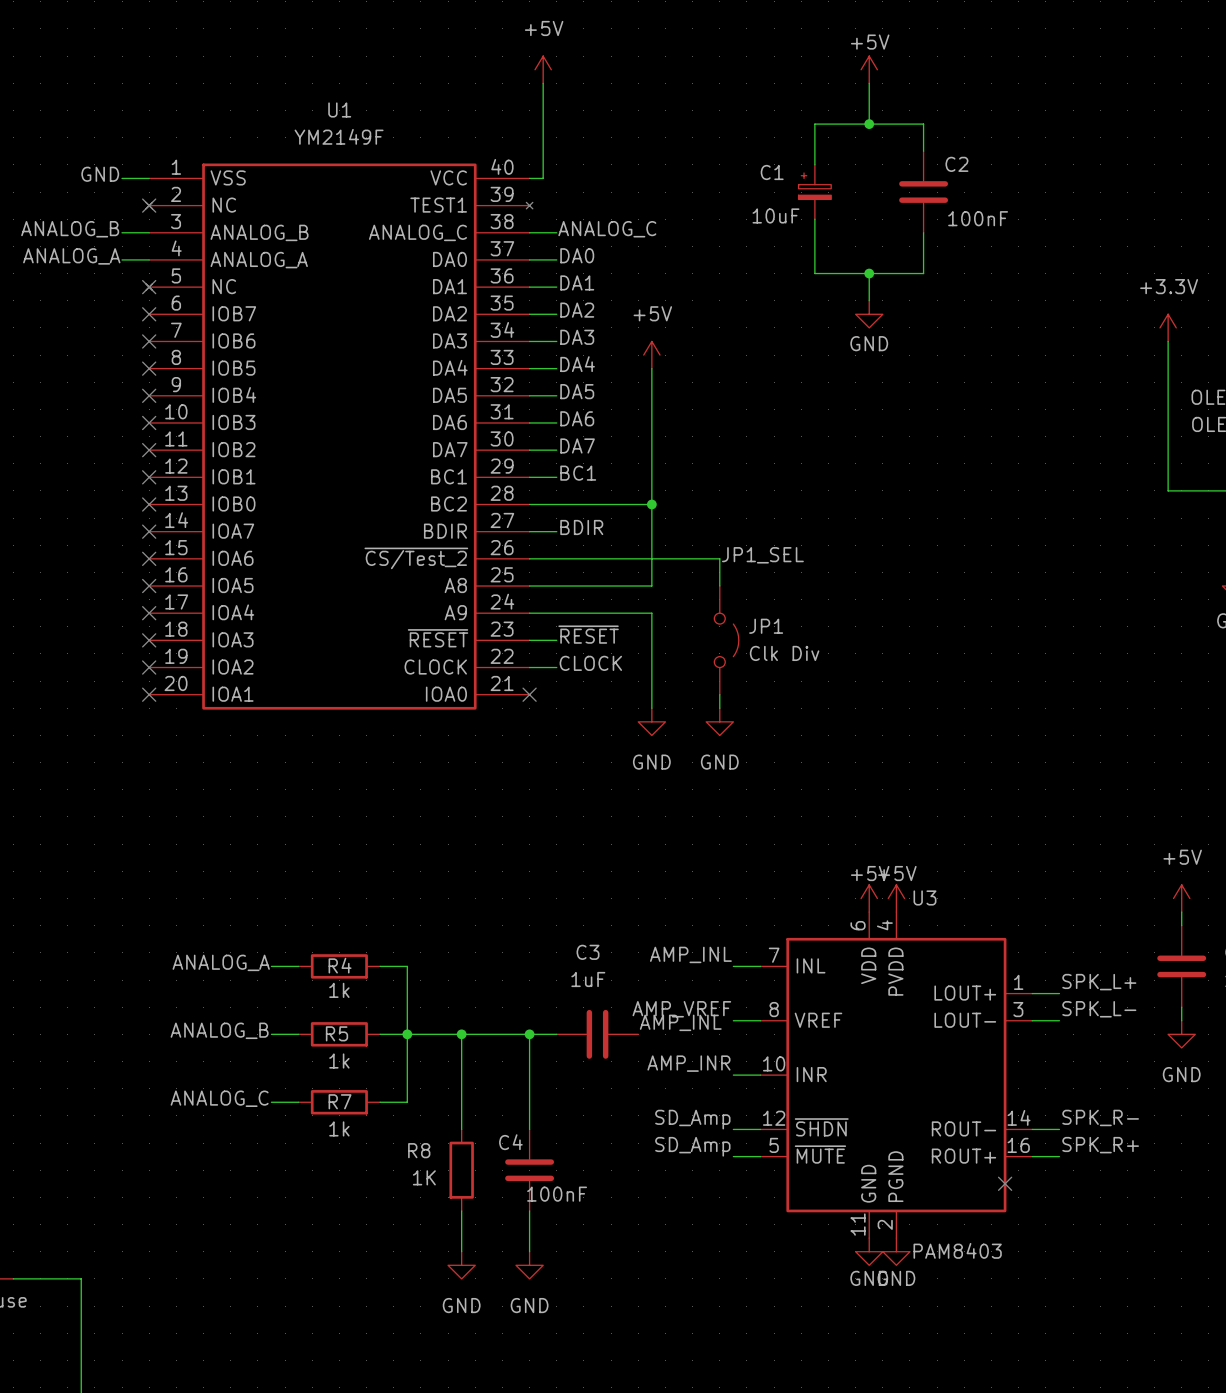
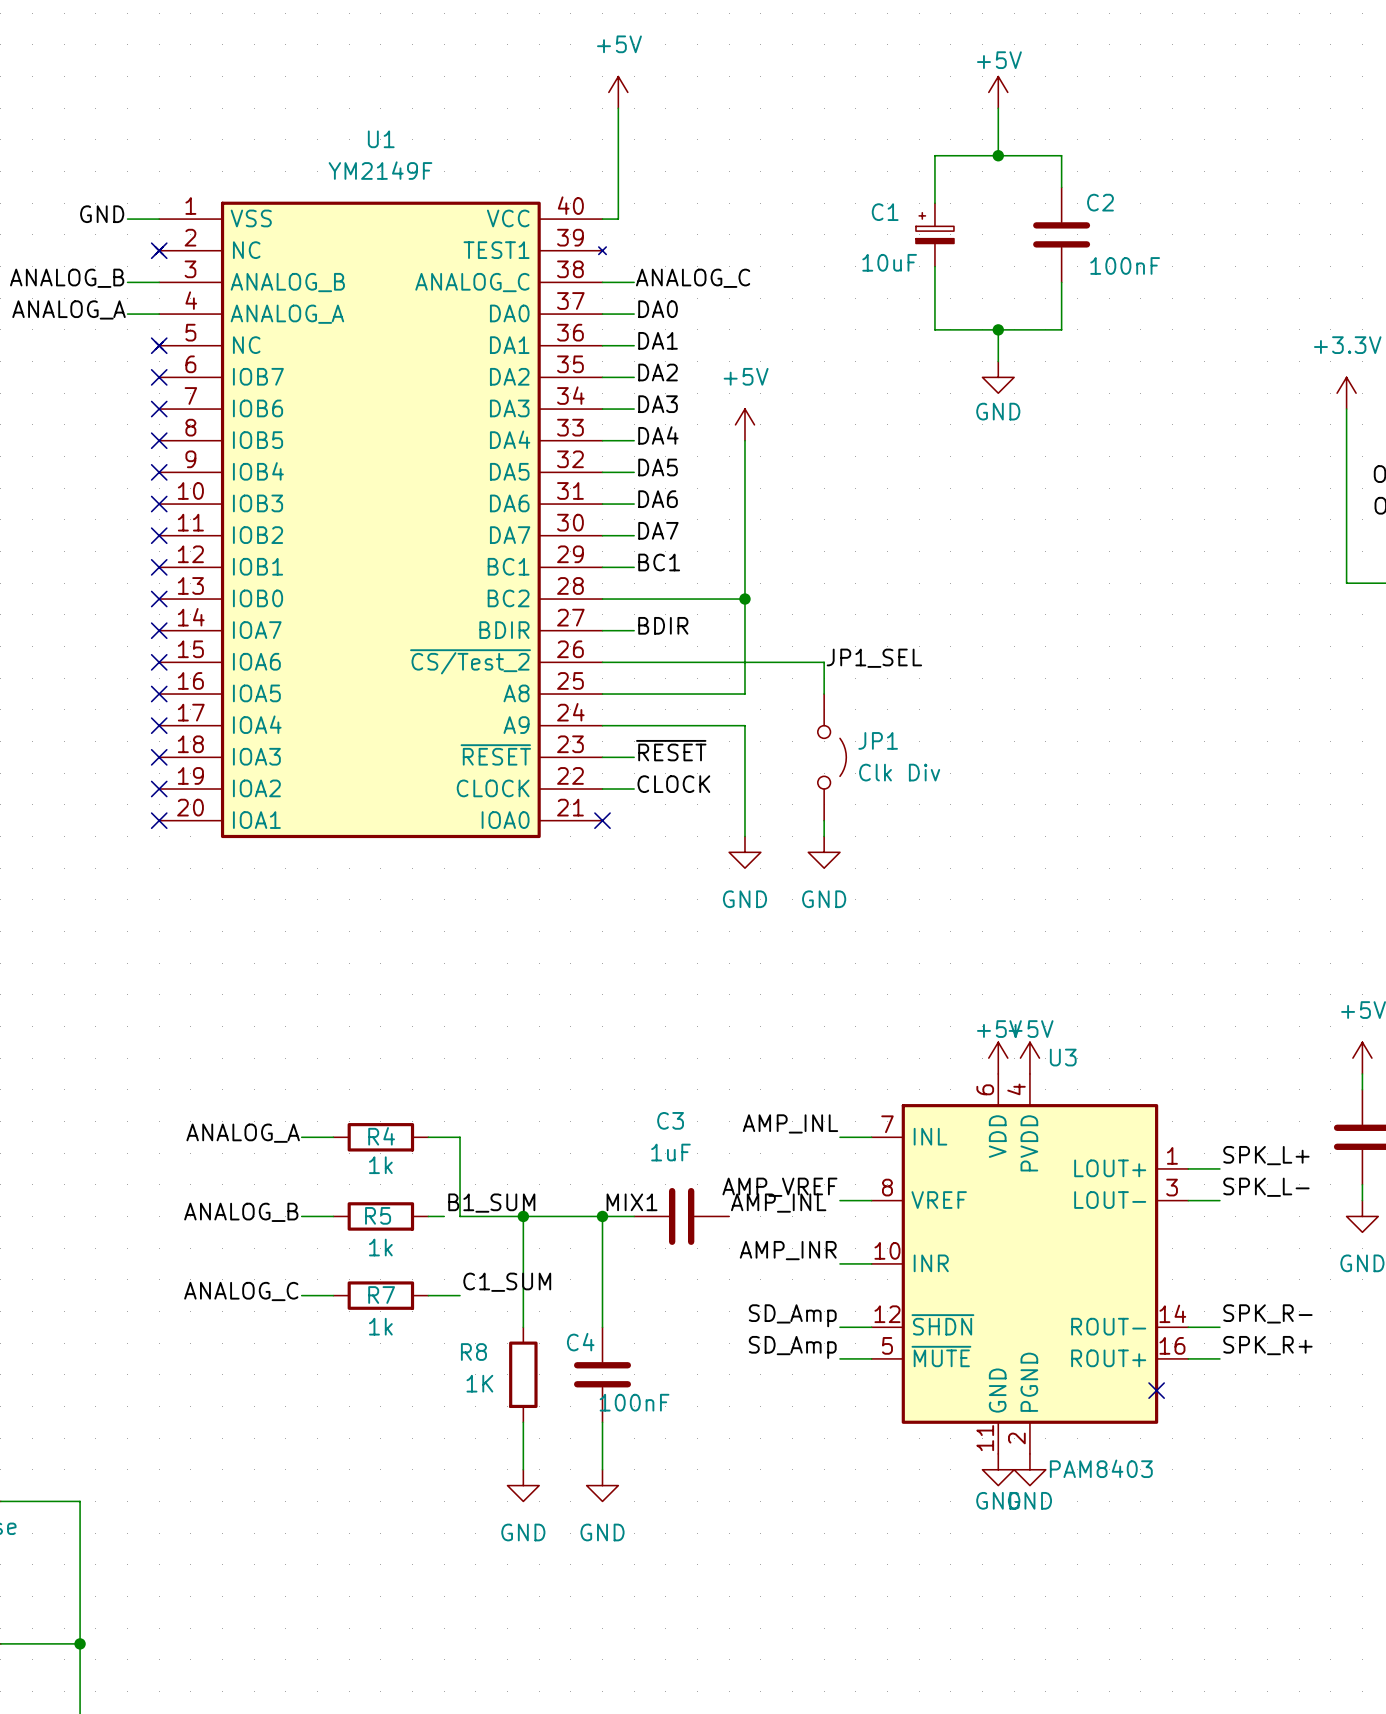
label: none -> B1_SUM (491, 1203)
label: none -> MIX1 (632, 1202)
wire: (393, 1034) (407, 1034) (407, 1102) -> none
junction: (407, 1034) -> none
label: none -> C1_SUM (507, 1282)

